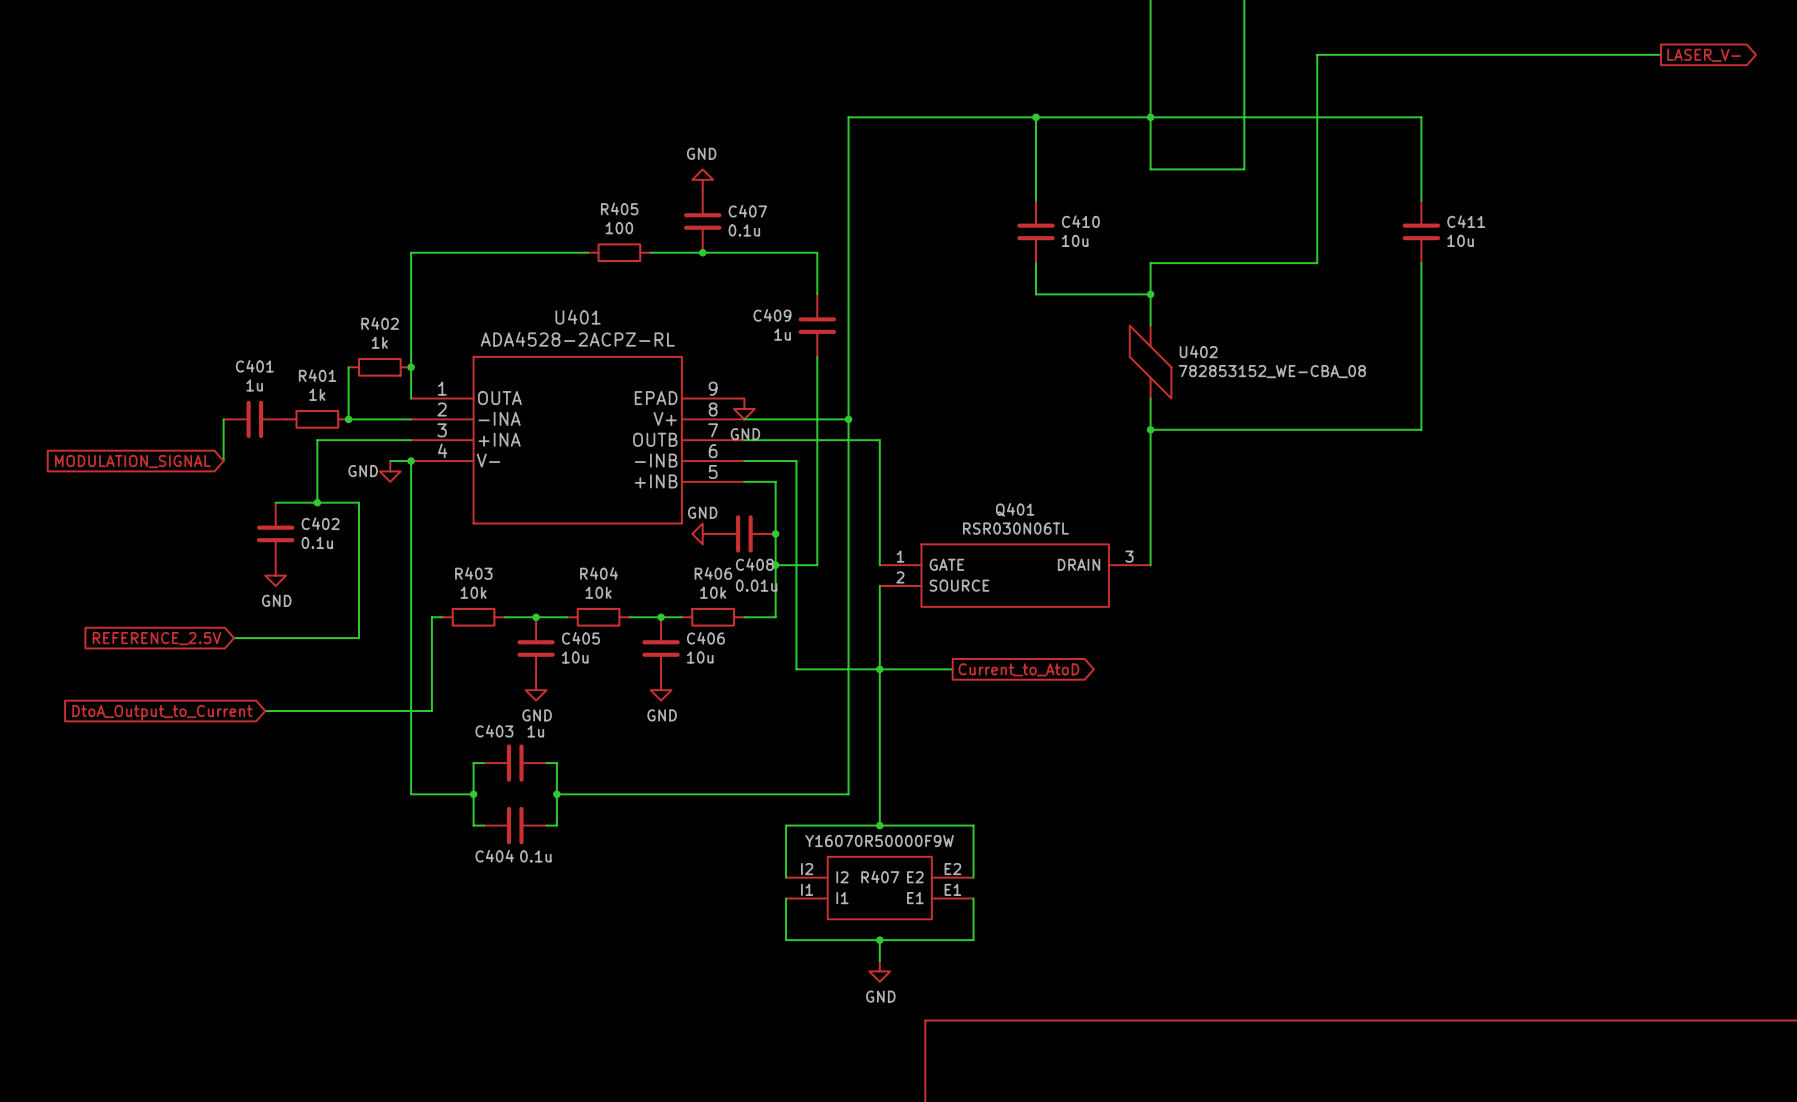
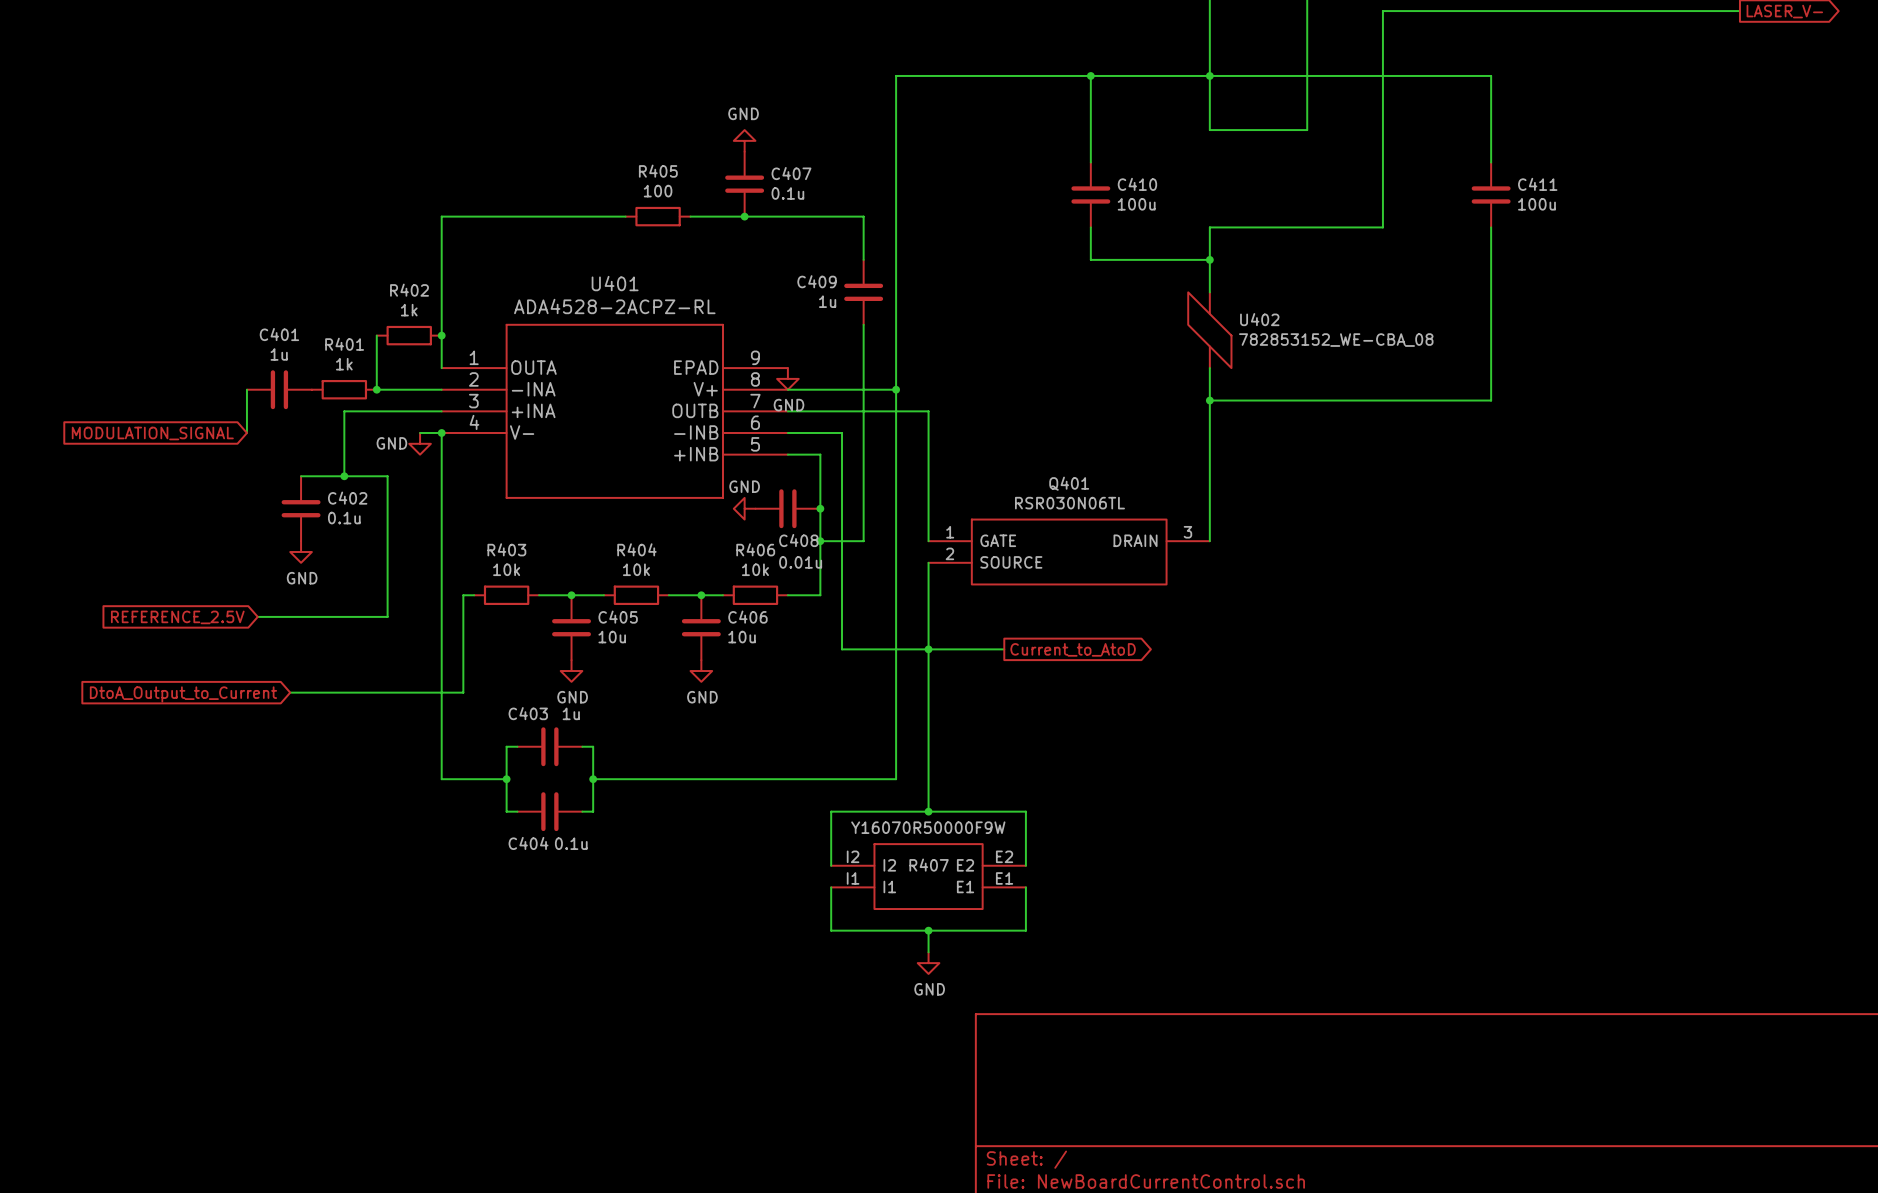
C410 value: 10u (1075, 240) -> 100u (1136, 204)
C411 value: 10u (1460, 240) -> 100u (1536, 204)

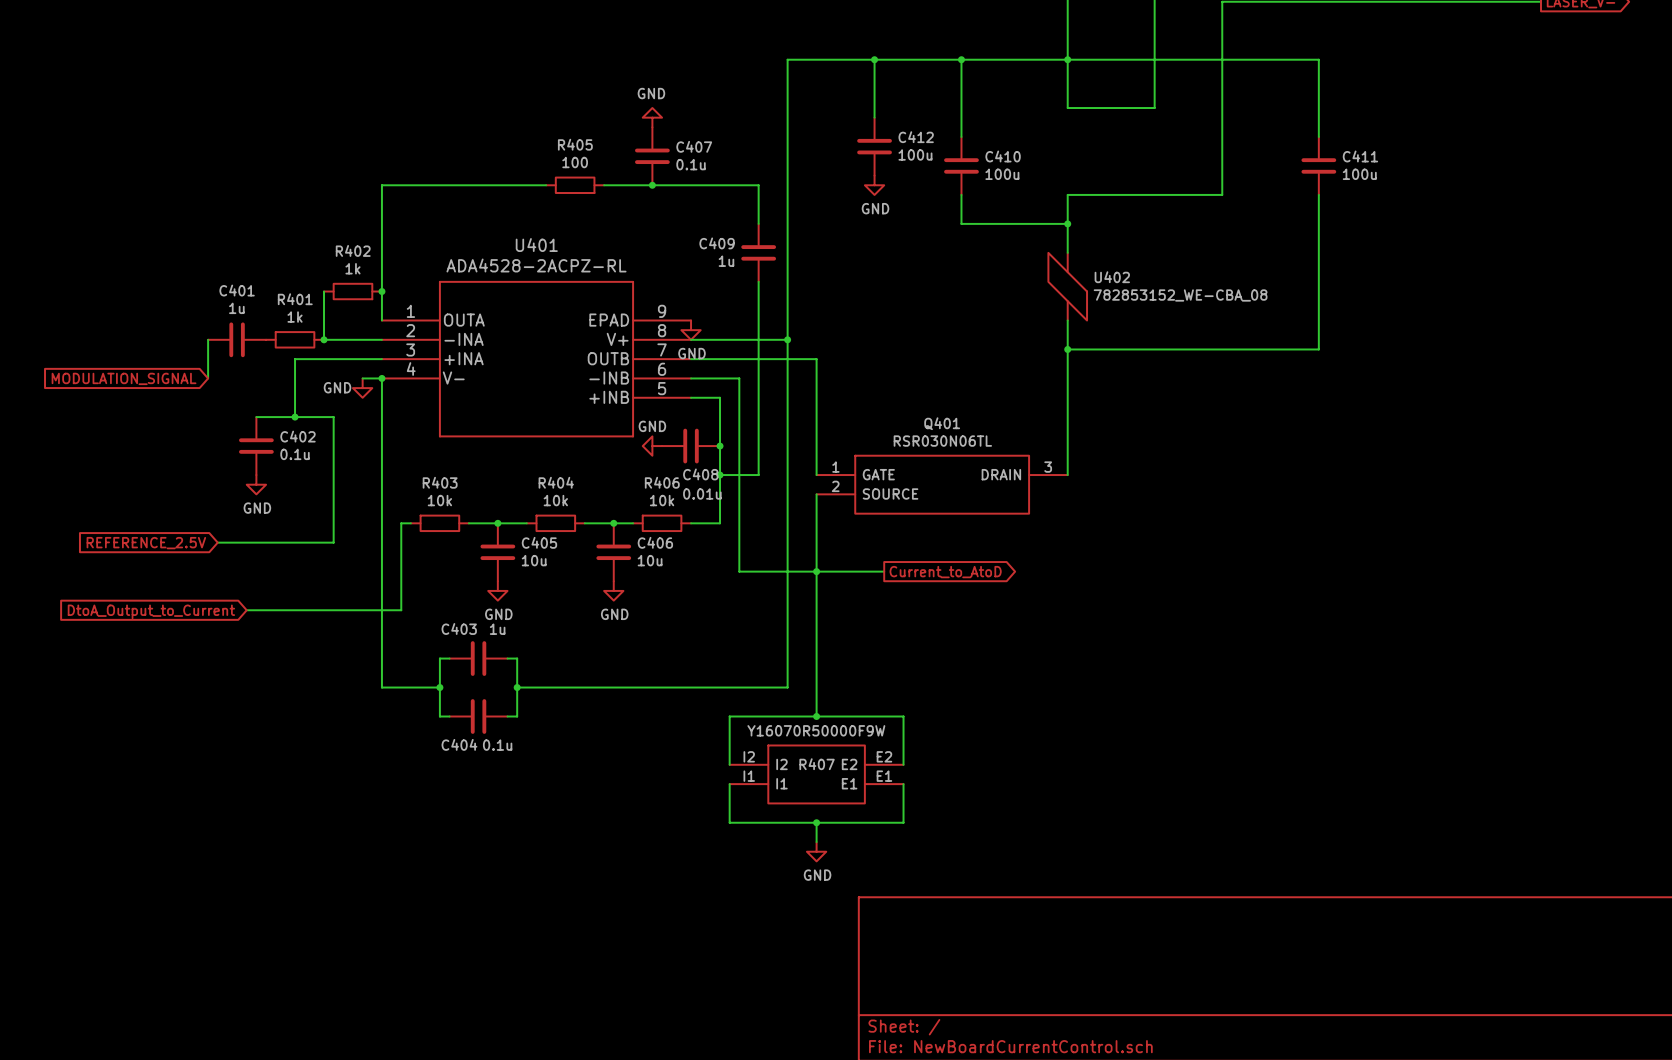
wire: none -> (874, 59) (874, 117)
junction: none -> (874, 59)
C412: none -> 100u (874, 146)
power symbol: none -> GND (874, 185)

